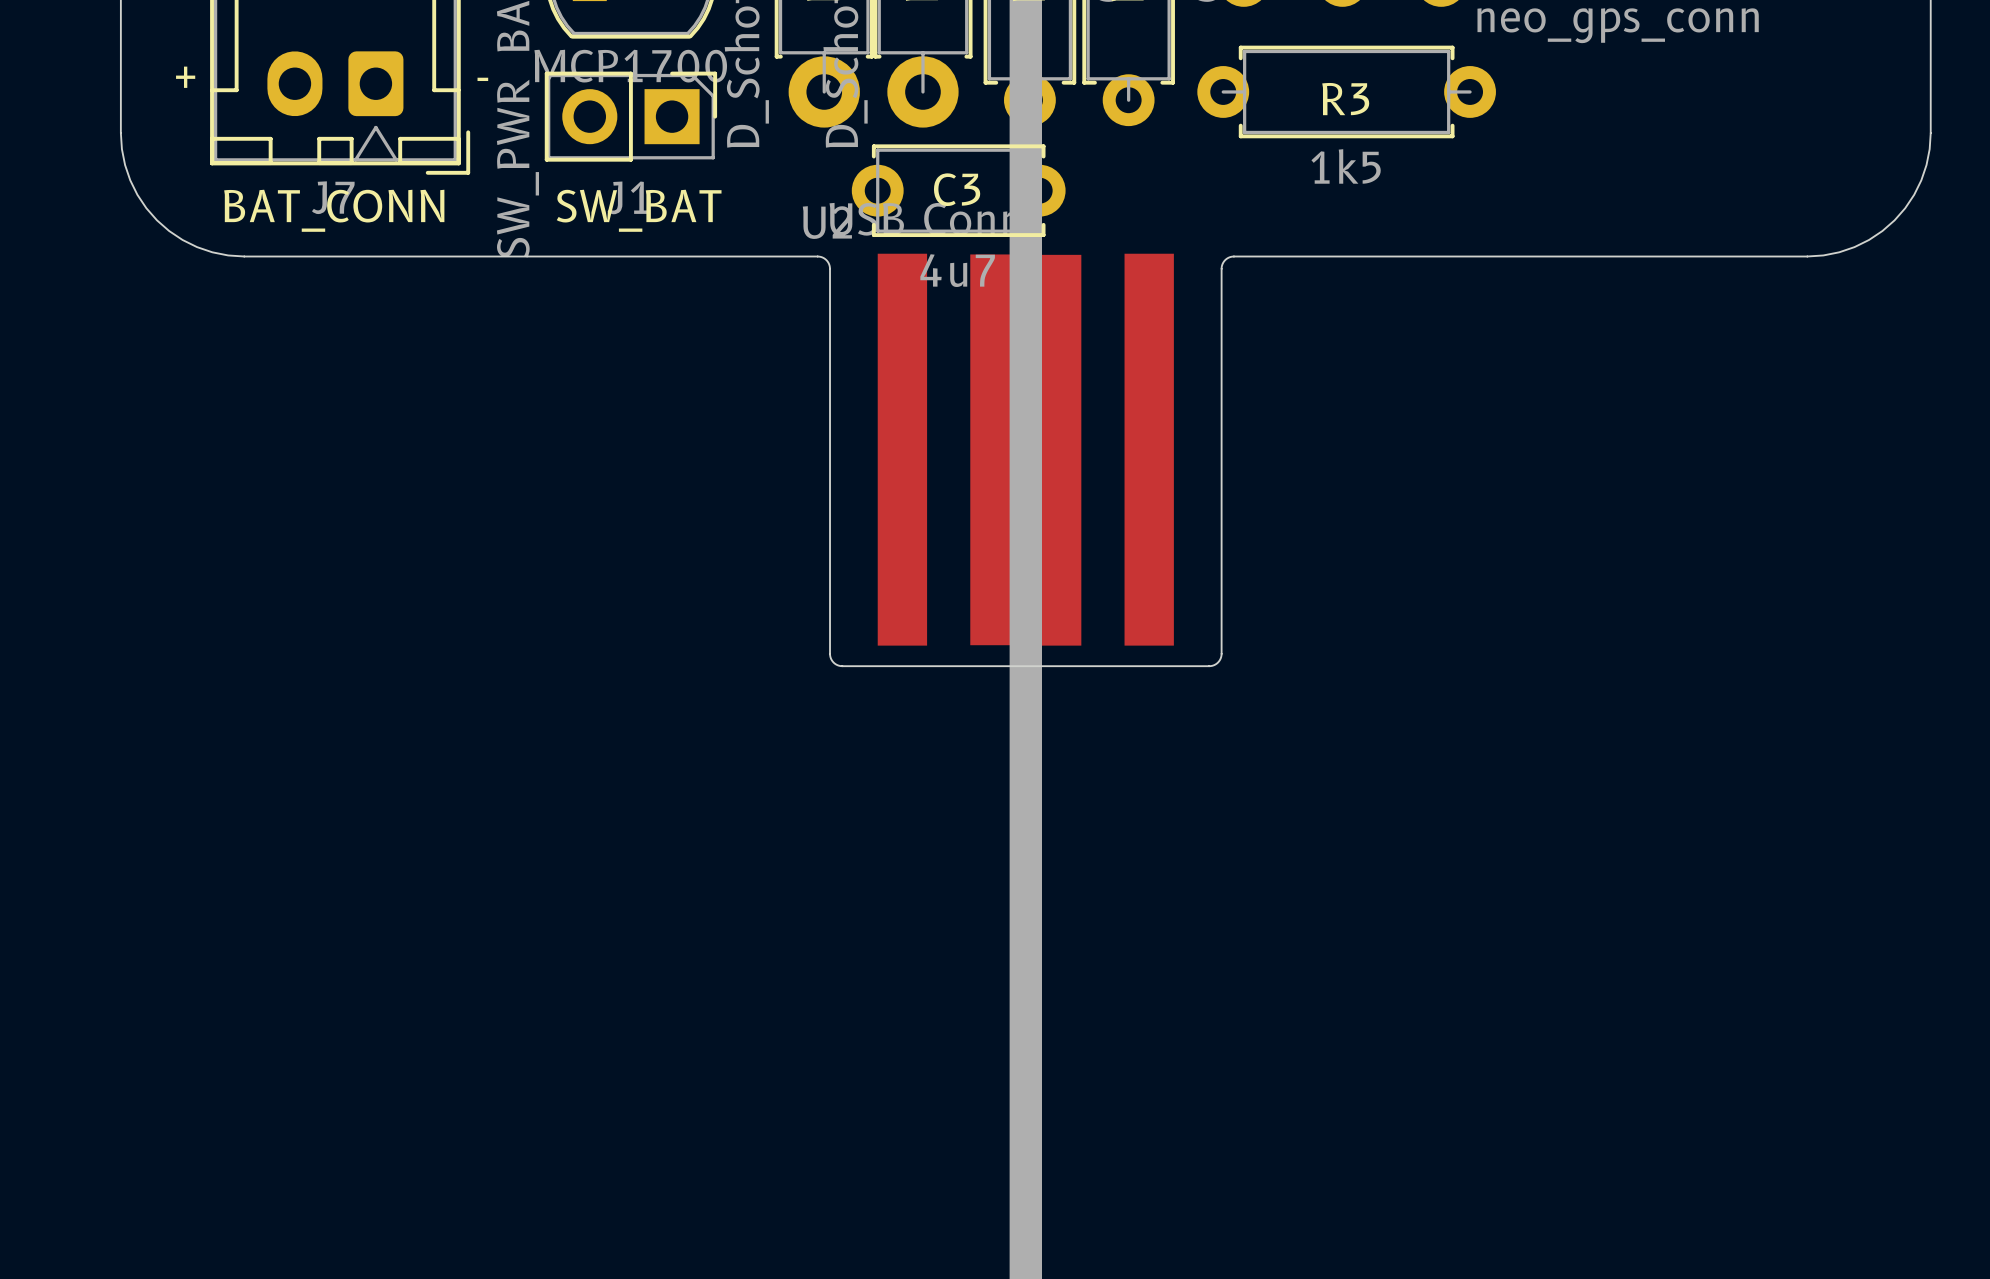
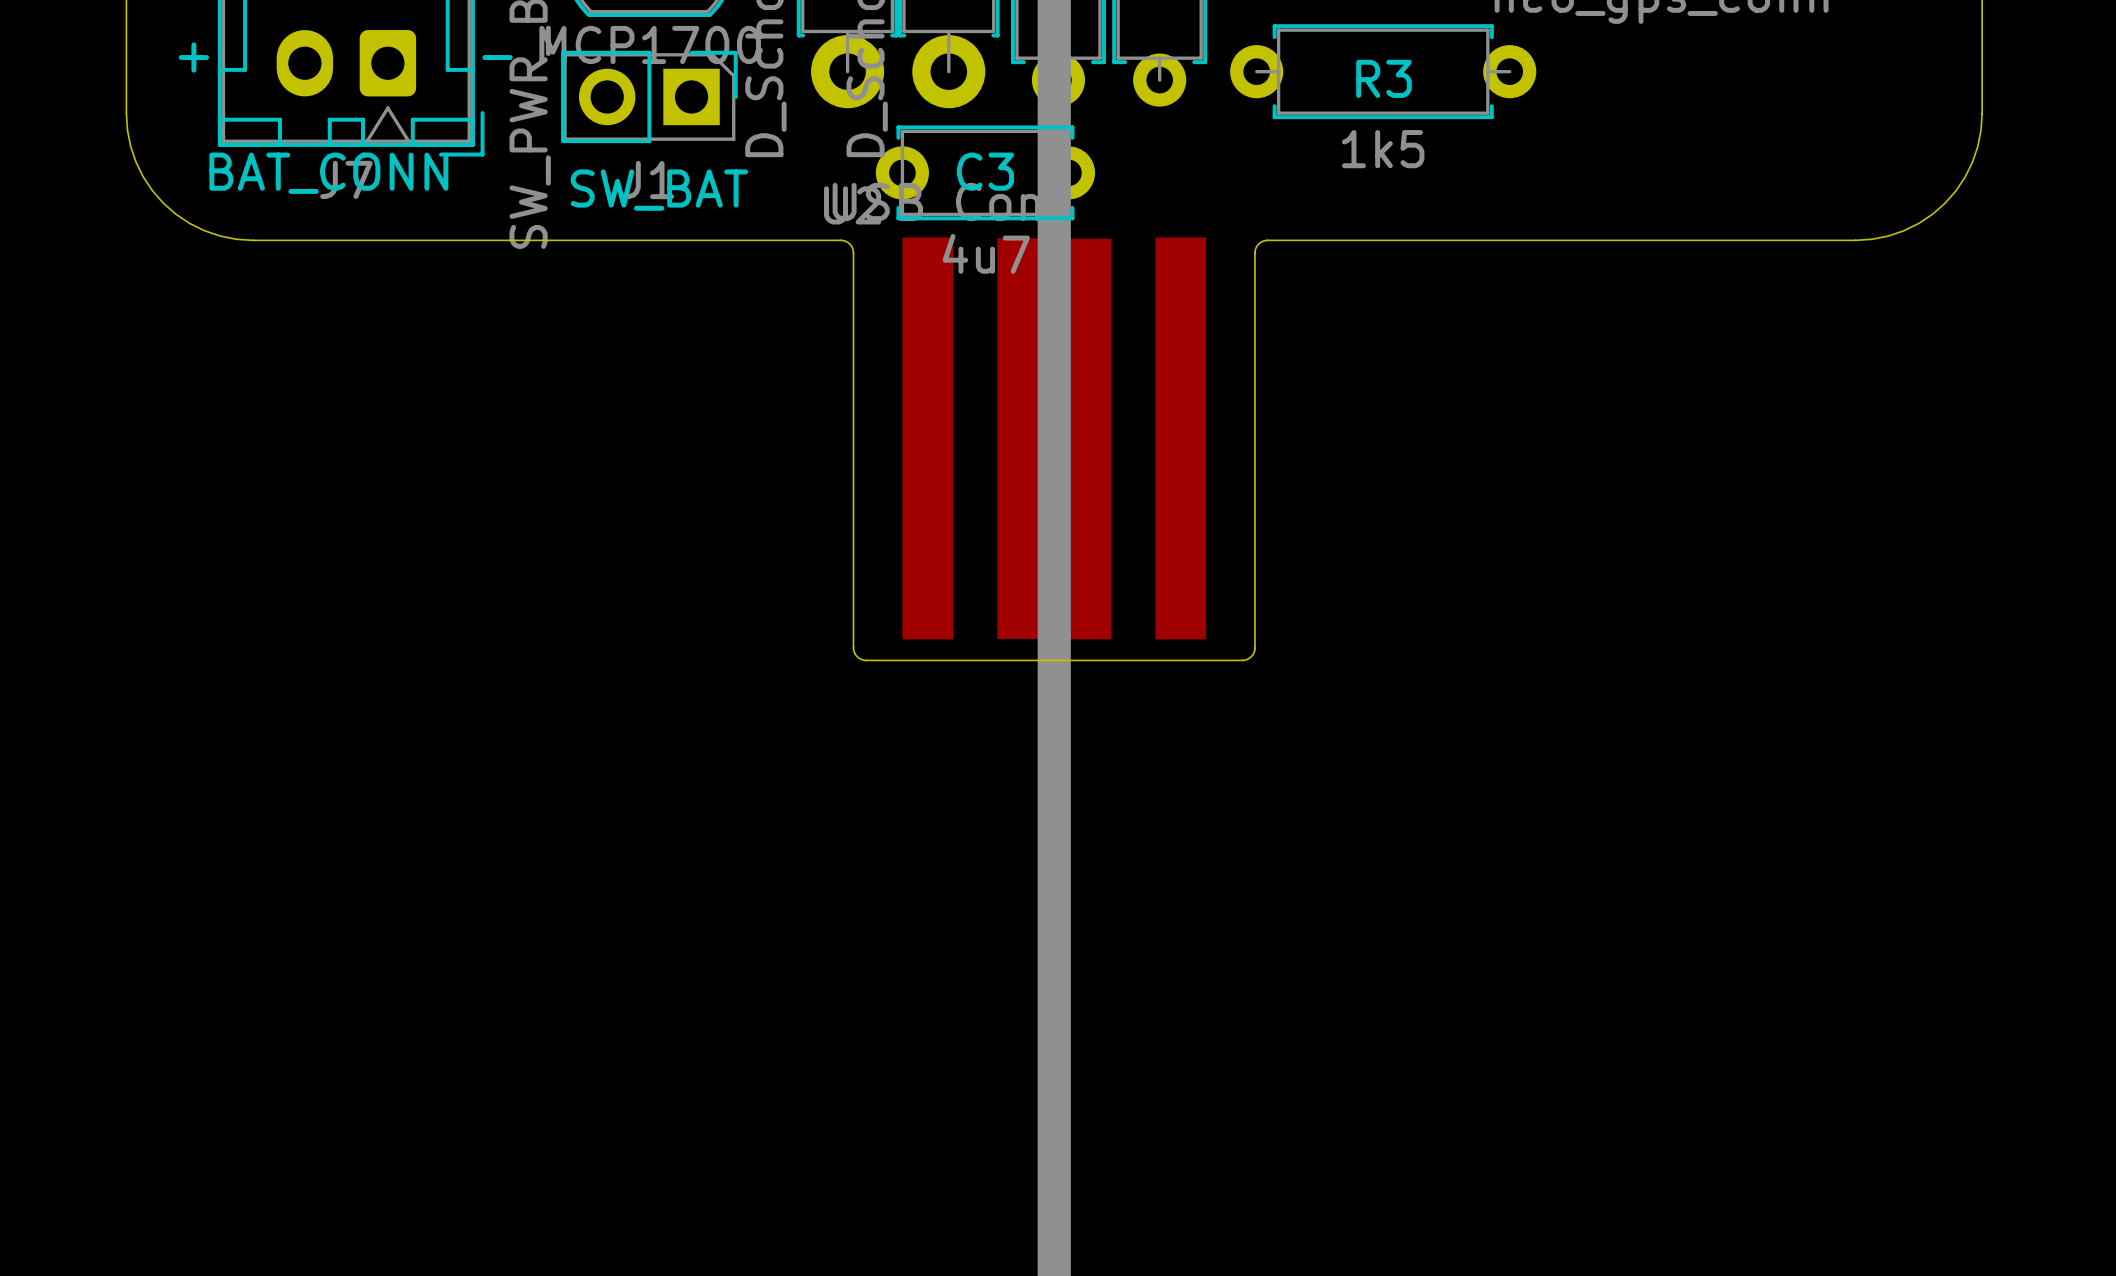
text position: BAT_CONN (334, 210) -> BAT_CONN (328, 173)

